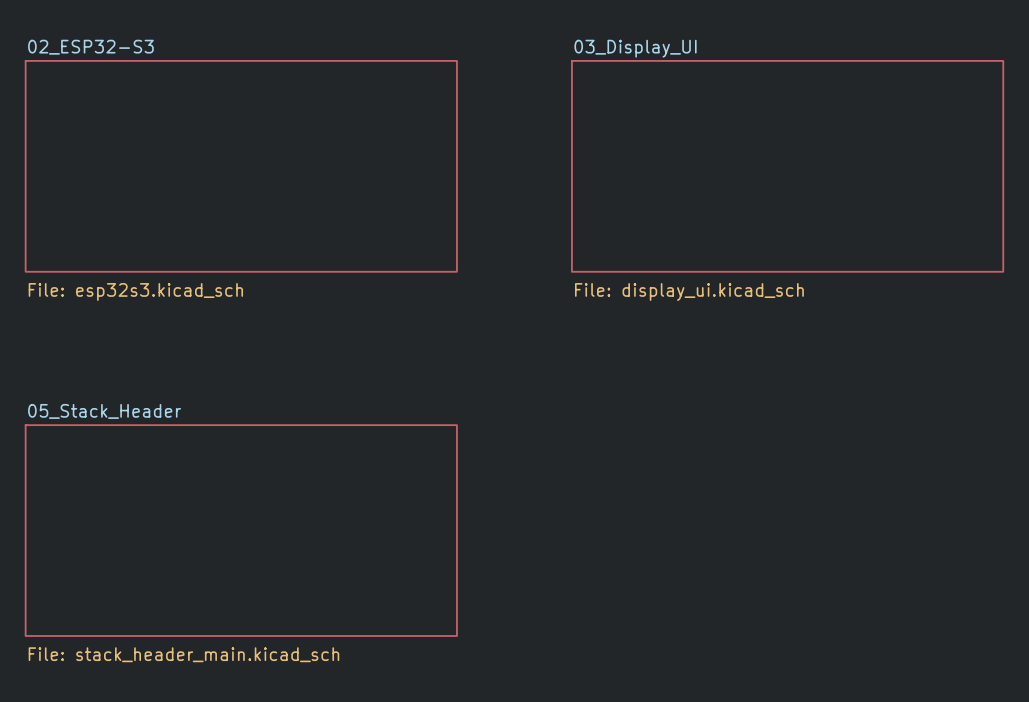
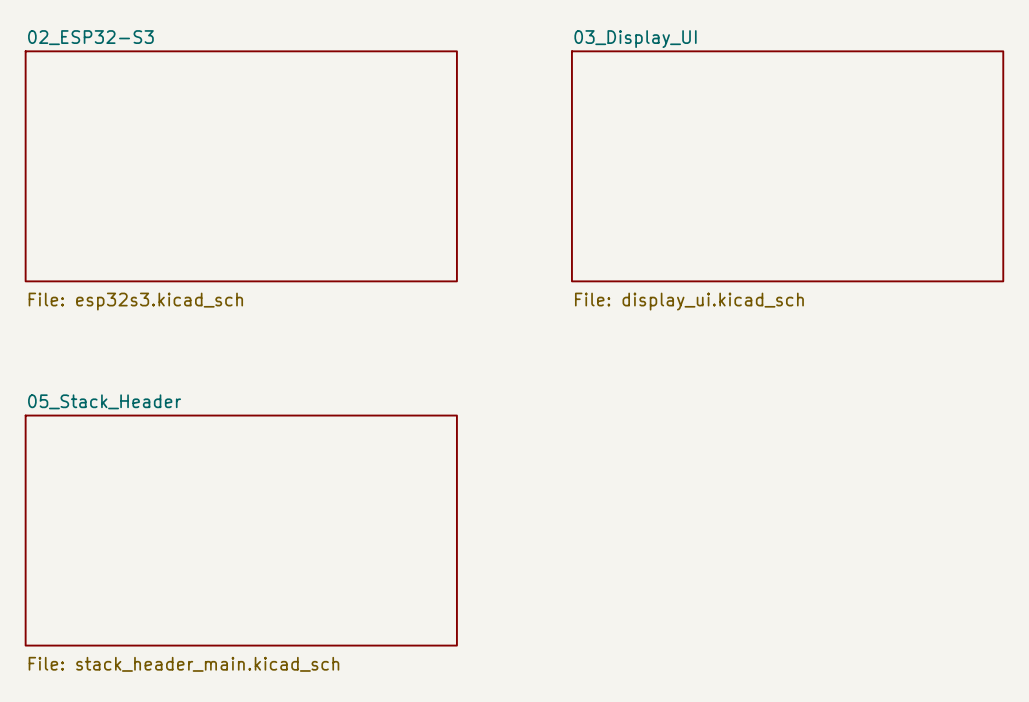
sheet 02_ESP32-S3 shape: [24, 60, 458, 273] -> [24, 50, 458, 283]
sheet 03_Display_UI shape: [571, 60, 1004, 273] -> [571, 50, 1004, 283]
sheet 05_Stack_Header shape: [24, 424, 458, 637] -> [24, 414, 458, 647]

